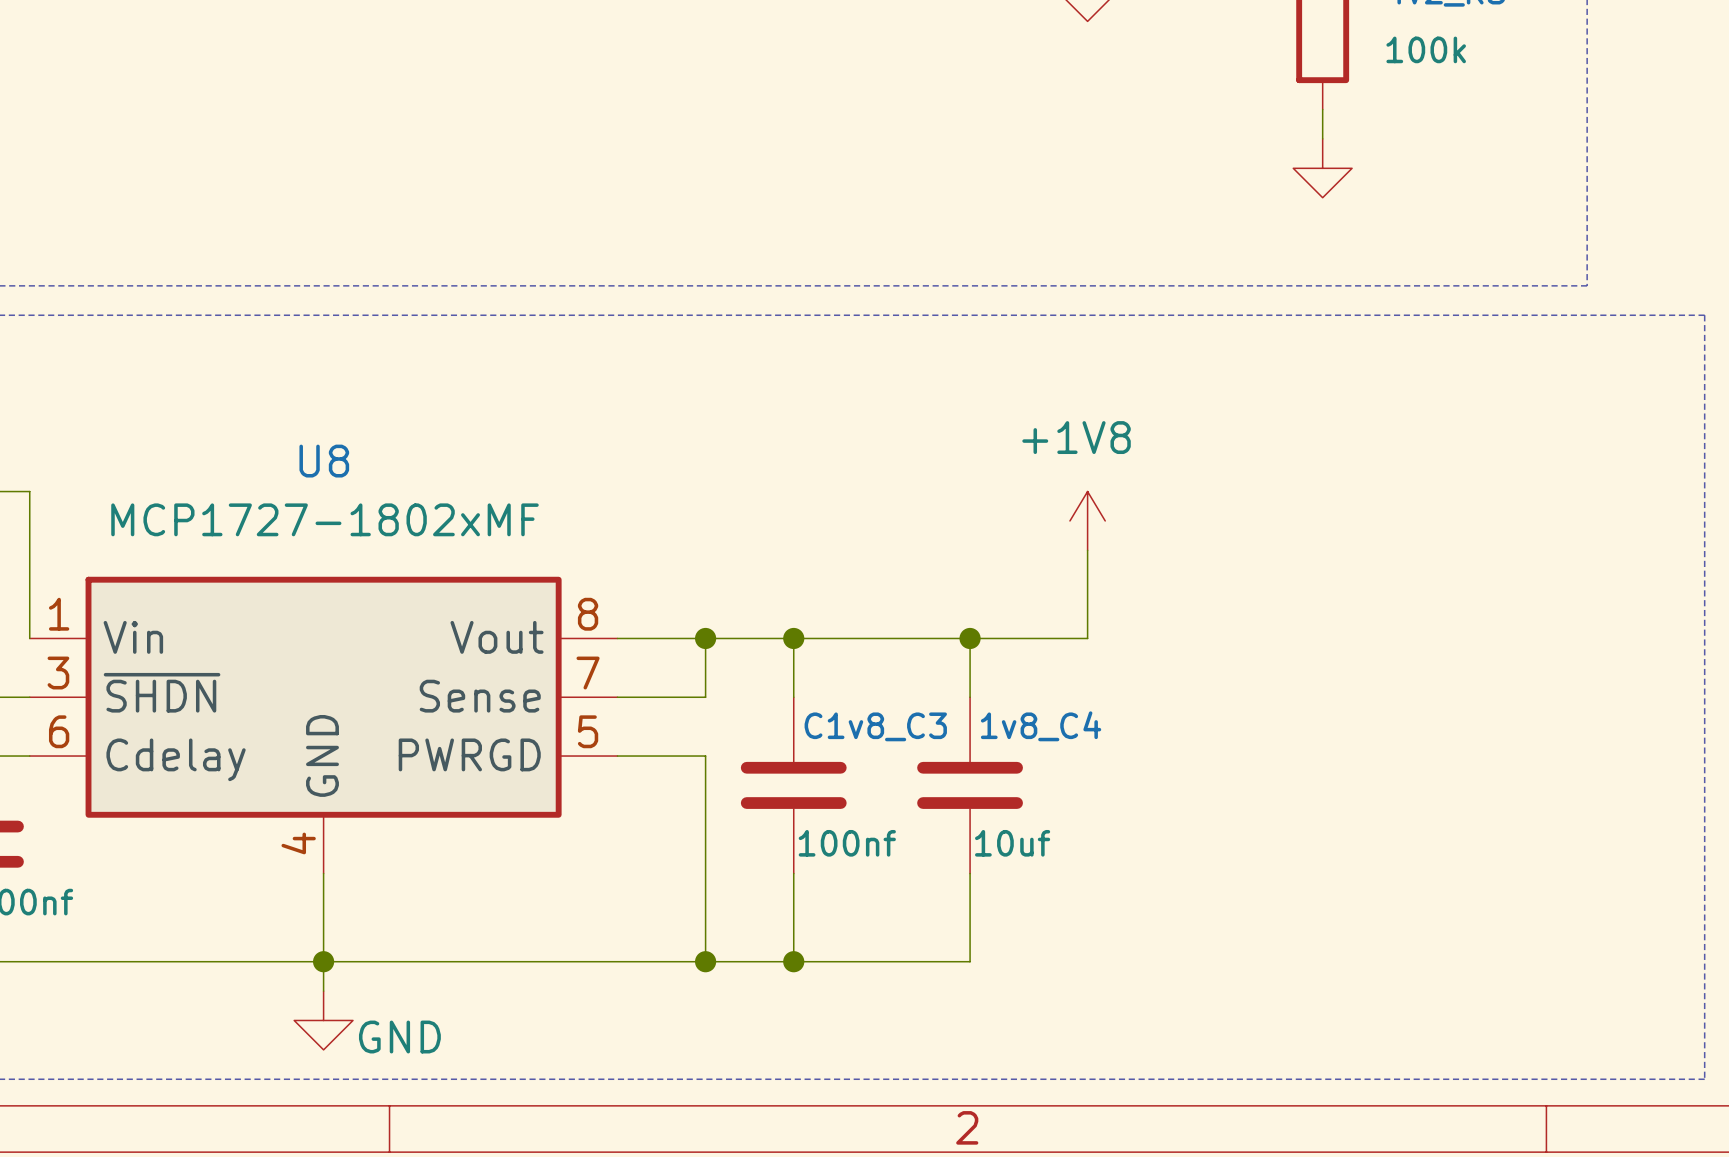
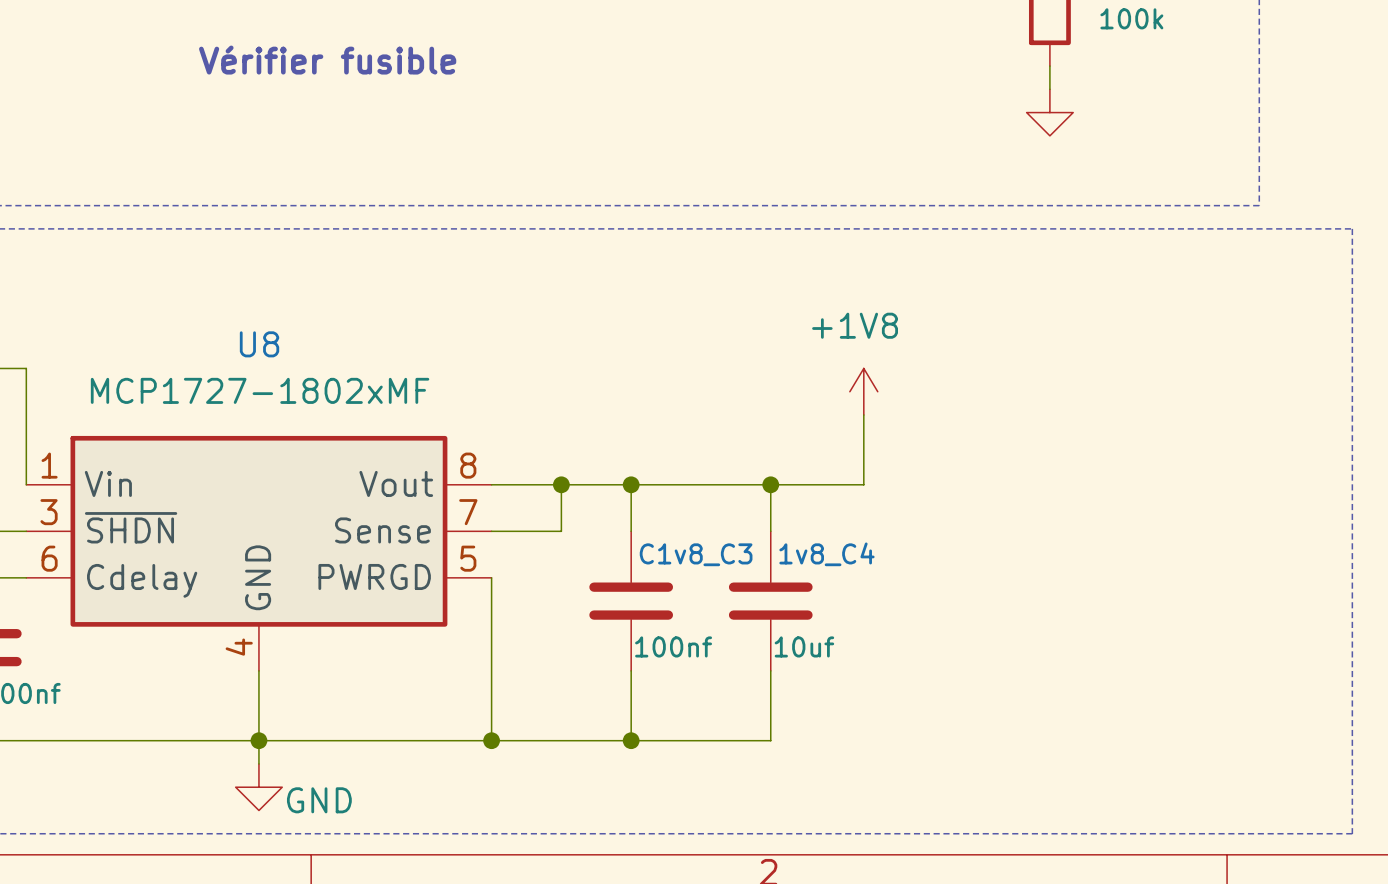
text: none -> Vérifier fusible (327, 60)
wire: (617, 756) (705, 756) (705, 961) -> (491, 577) (491, 740)
junction position: (705, 961) -> (491, 740)

